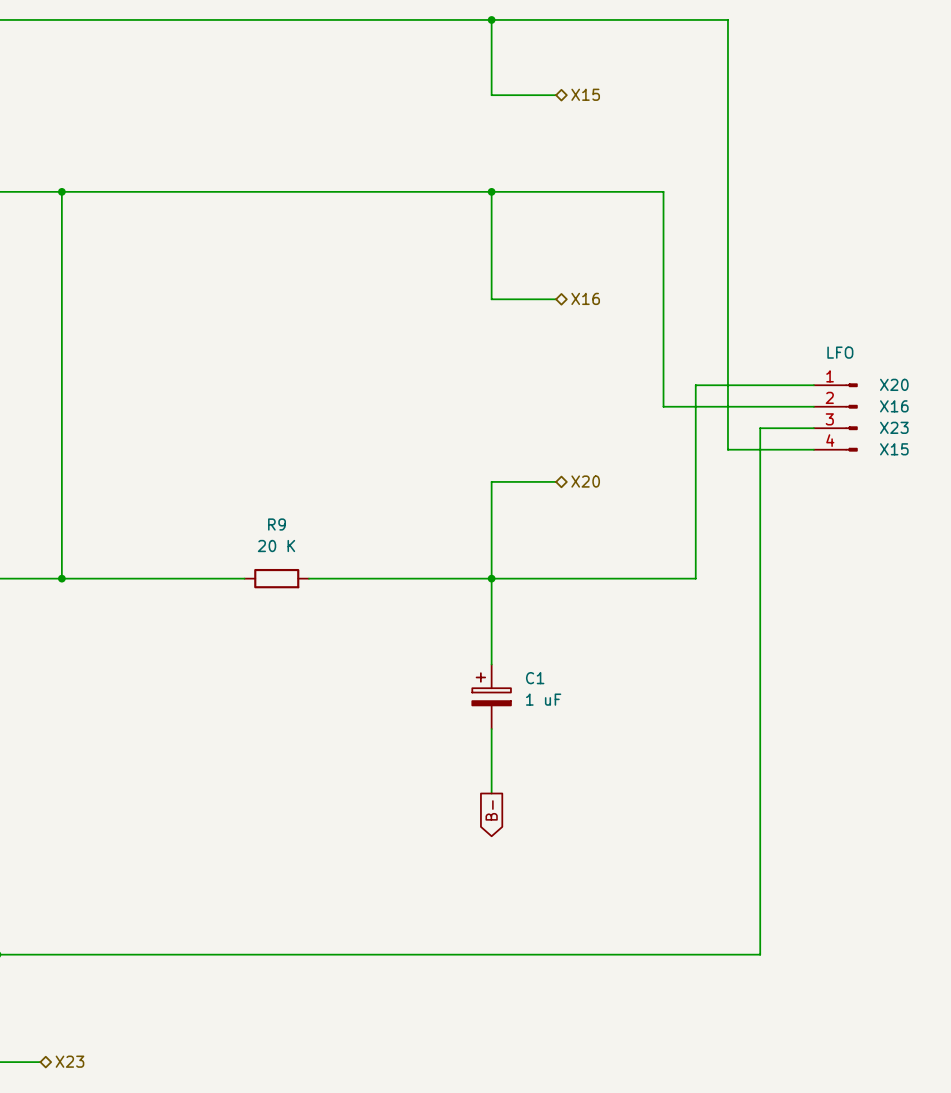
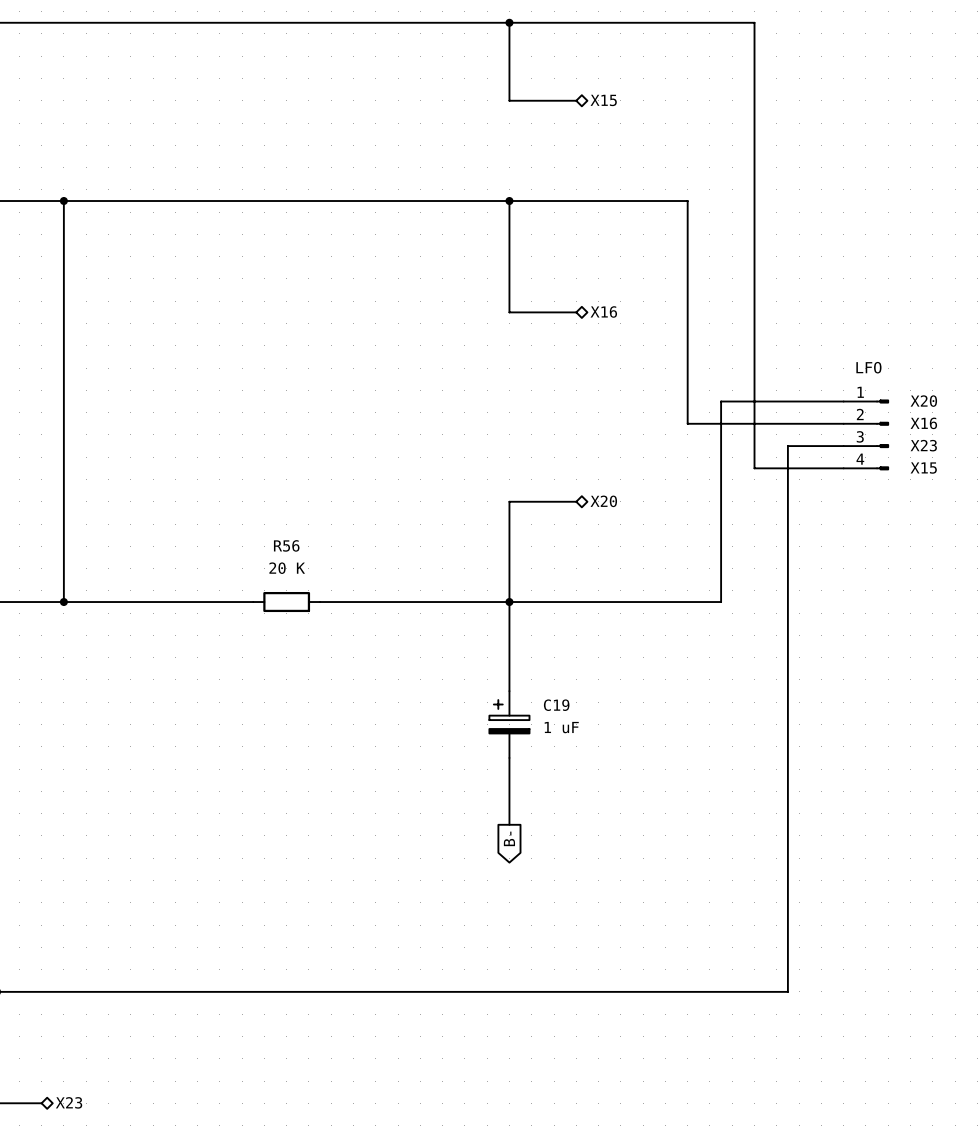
R9 name: R9 (277, 524) -> R56 (286, 545)
C1 name: C1 (535, 678) -> C19 (556, 705)

